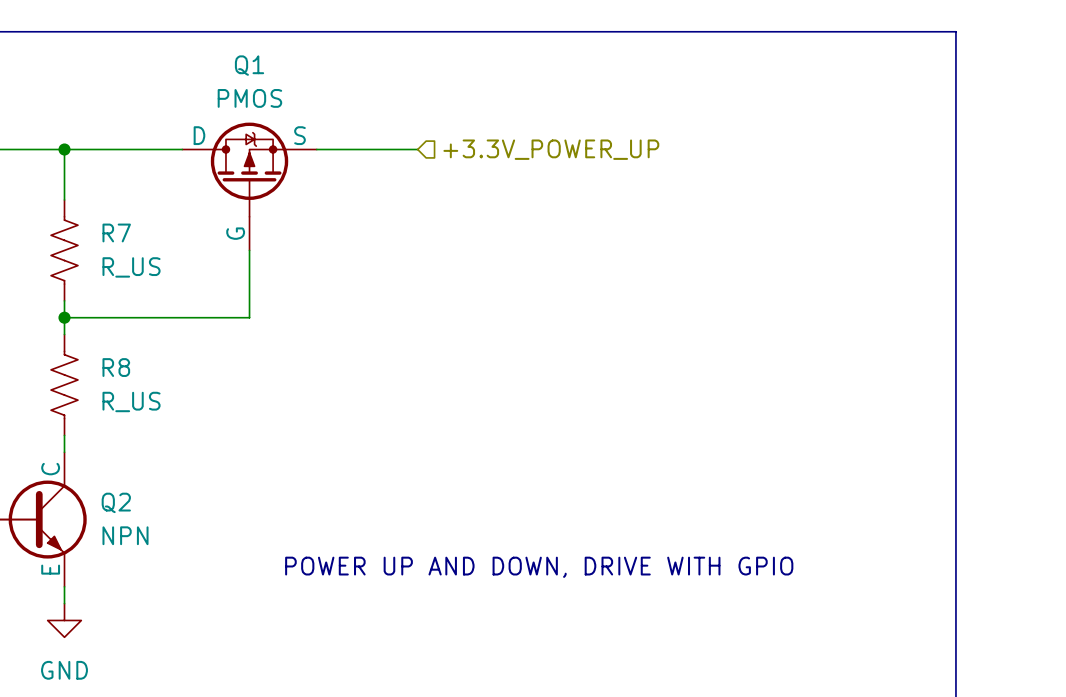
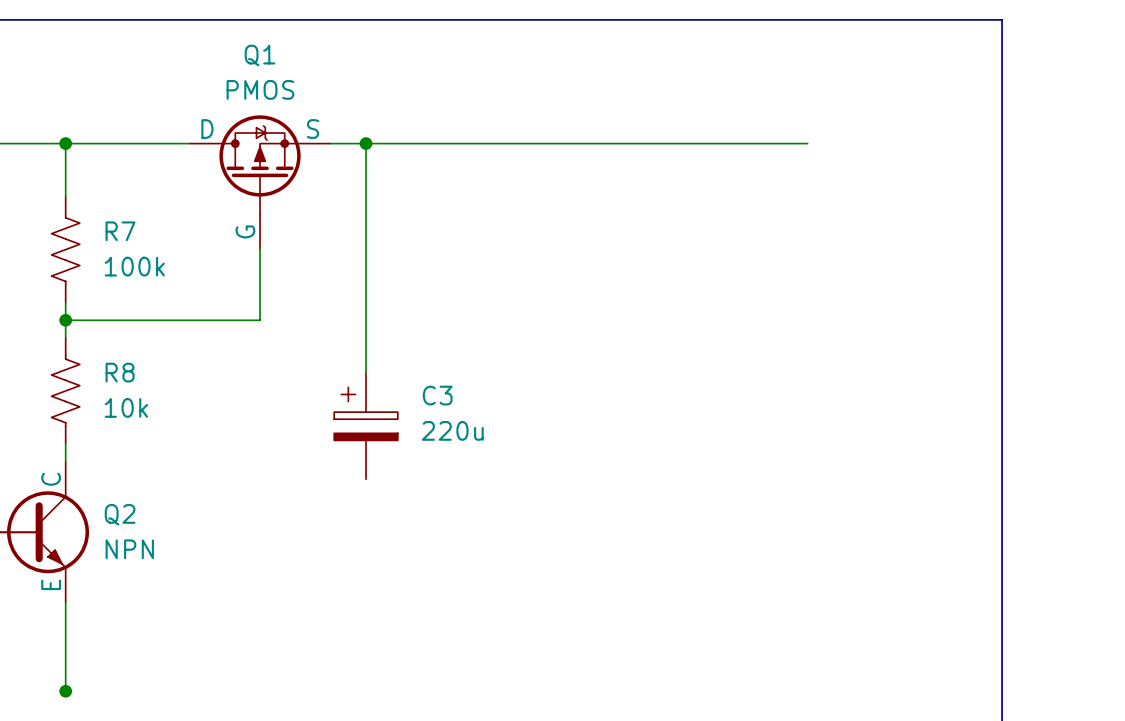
wire: none -> (366, 143) (366, 373)
junction: none -> (366, 143)
wire: none -> (436, 143) (807, 143)
hierarchical label: +3.3V_POWER_UP (551, 149) -> none
R7 value: R_US (131, 267) -> 100k (134, 266)
R8 value: R_US (131, 401) -> 10k (126, 407)
C3: none -> 220u (366, 426)
text: POWER UP AND DOWN, DRIVE WITH GPIO (539, 567) -> none
wire: none -> (65, 620) (65, 691)
power symbol: GND (64, 620) -> none
junction: none -> (65, 691)

